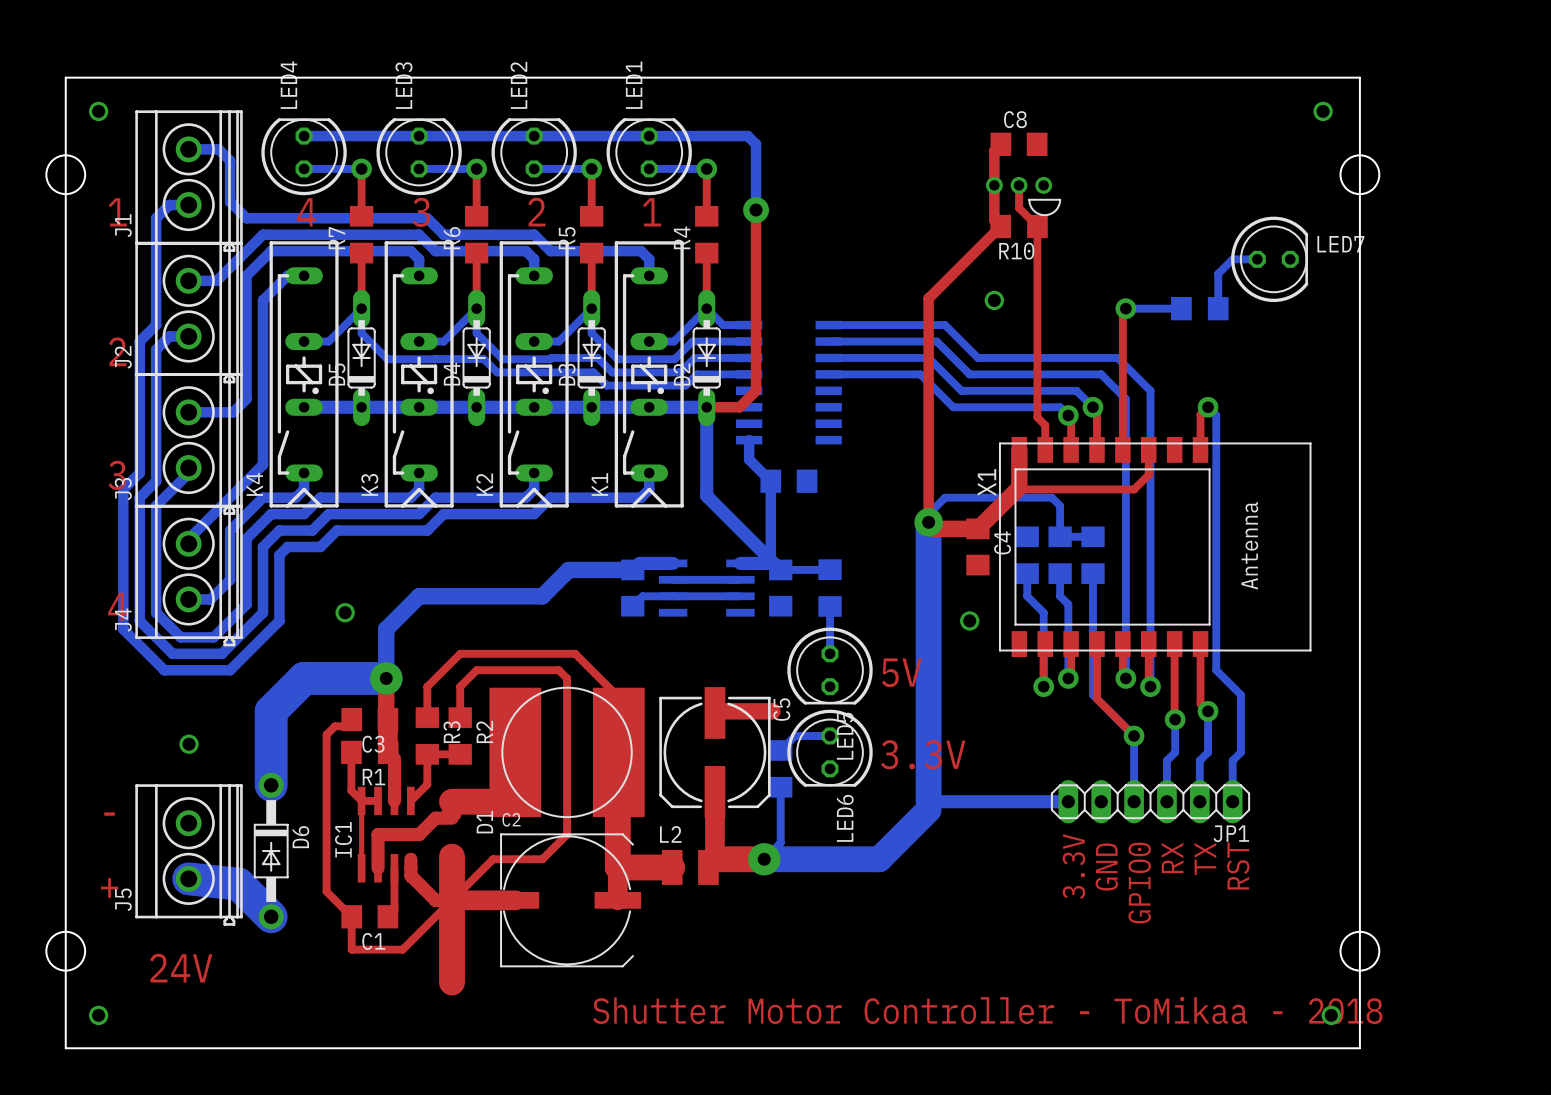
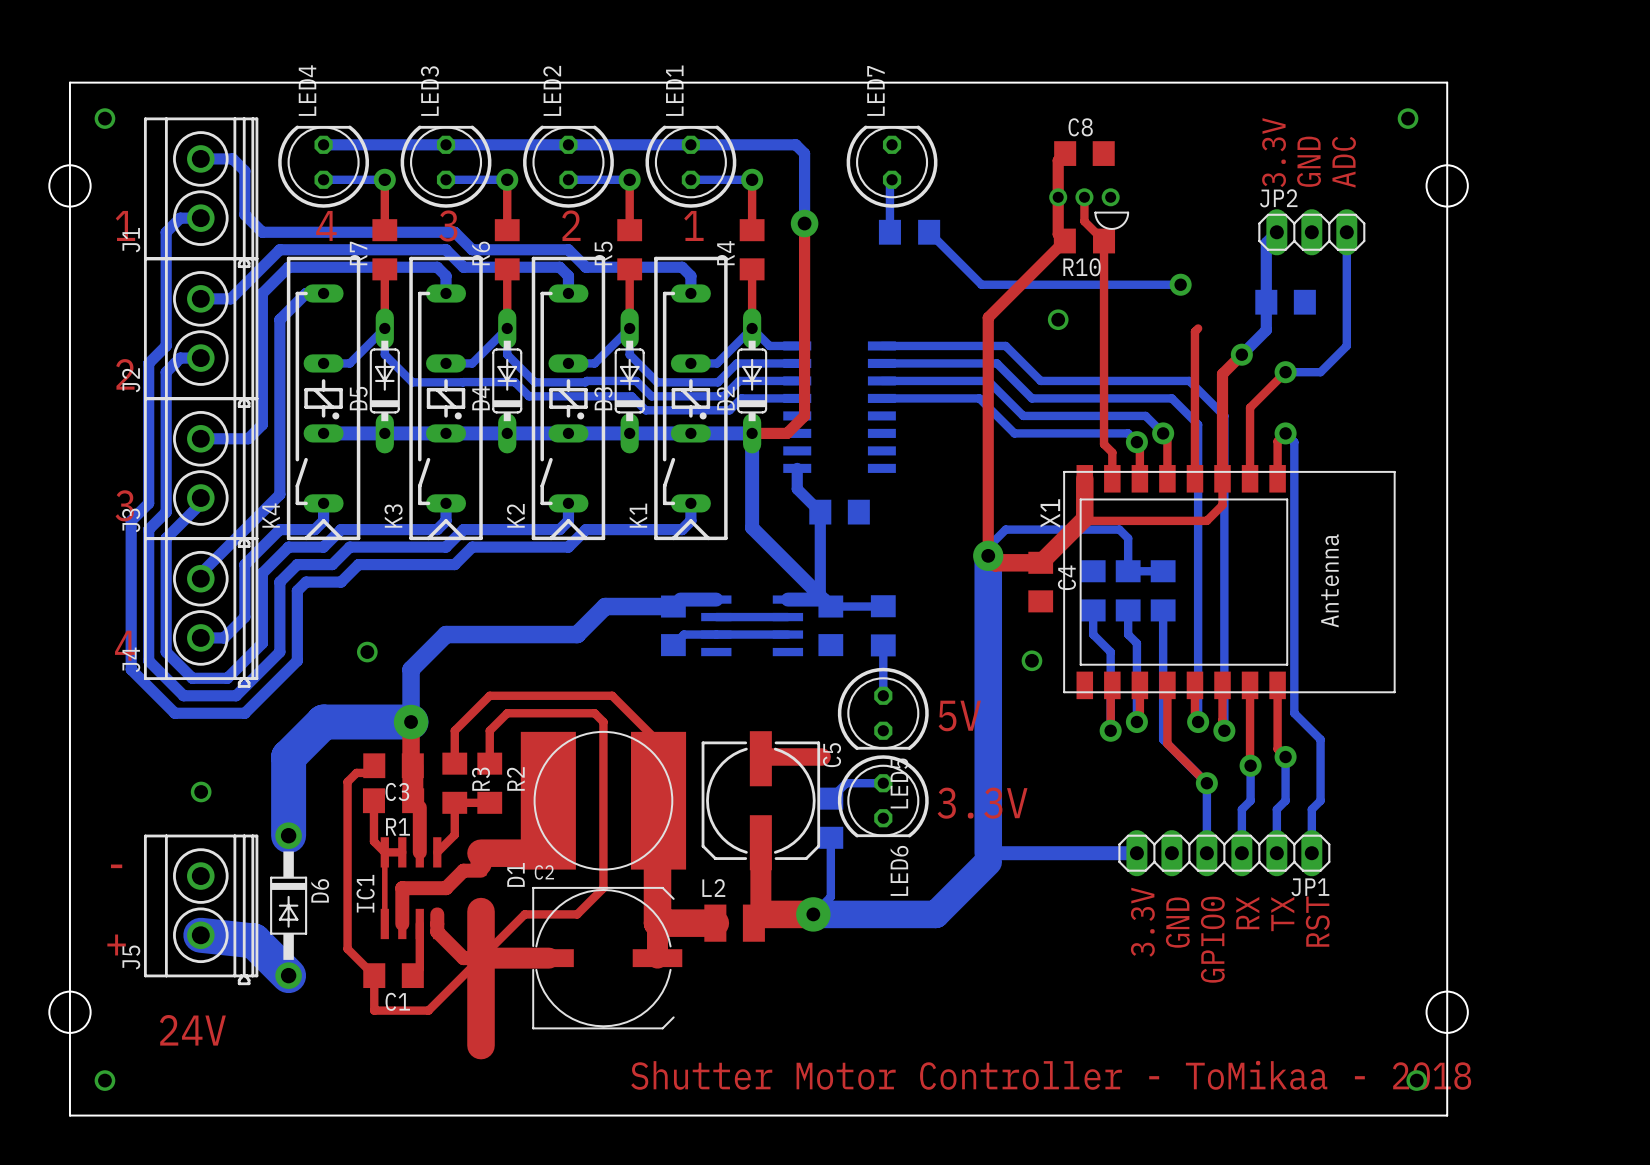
text: none -> 3.3V (1274, 152)
text: none -> GND (1309, 161)
text: none -> ADC (1344, 162)
bottom track: none -> (892, 179) (889, 181) (889, 232)
part: none -> (909, 232)
bottom track: none -> (929, 232) (981, 284) (1180, 284)
bottom track: none -> (1276, 232) (1266, 242) (1266, 330) (1241, 354)
JP2: none -> (1311, 232)
bottom track: none -> (1346, 232) (1346, 345) (1320, 372) (1285, 372)
bottom track: (1257, 259) (1232, 259) (1218, 273) (1218, 308) -> none
LED7 rotation: 0° (1269, 259) -> 90° counterclockwise (892, 166)
LED7 position: (1269, 259) -> (892, 166)
via: none -> (1180, 284)
part: none -> (1285, 302)
bottom track: (1125, 308) (1181, 308) -> none
via: (1125, 308) -> none
part: (1199, 308) -> none
top track: none -> (1241, 354) (1222, 374) (1222, 478)
via: none -> (1241, 354)
top track: none -> (1285, 372) (1250, 407) (1250, 478)
via: none -> (1285, 372)

